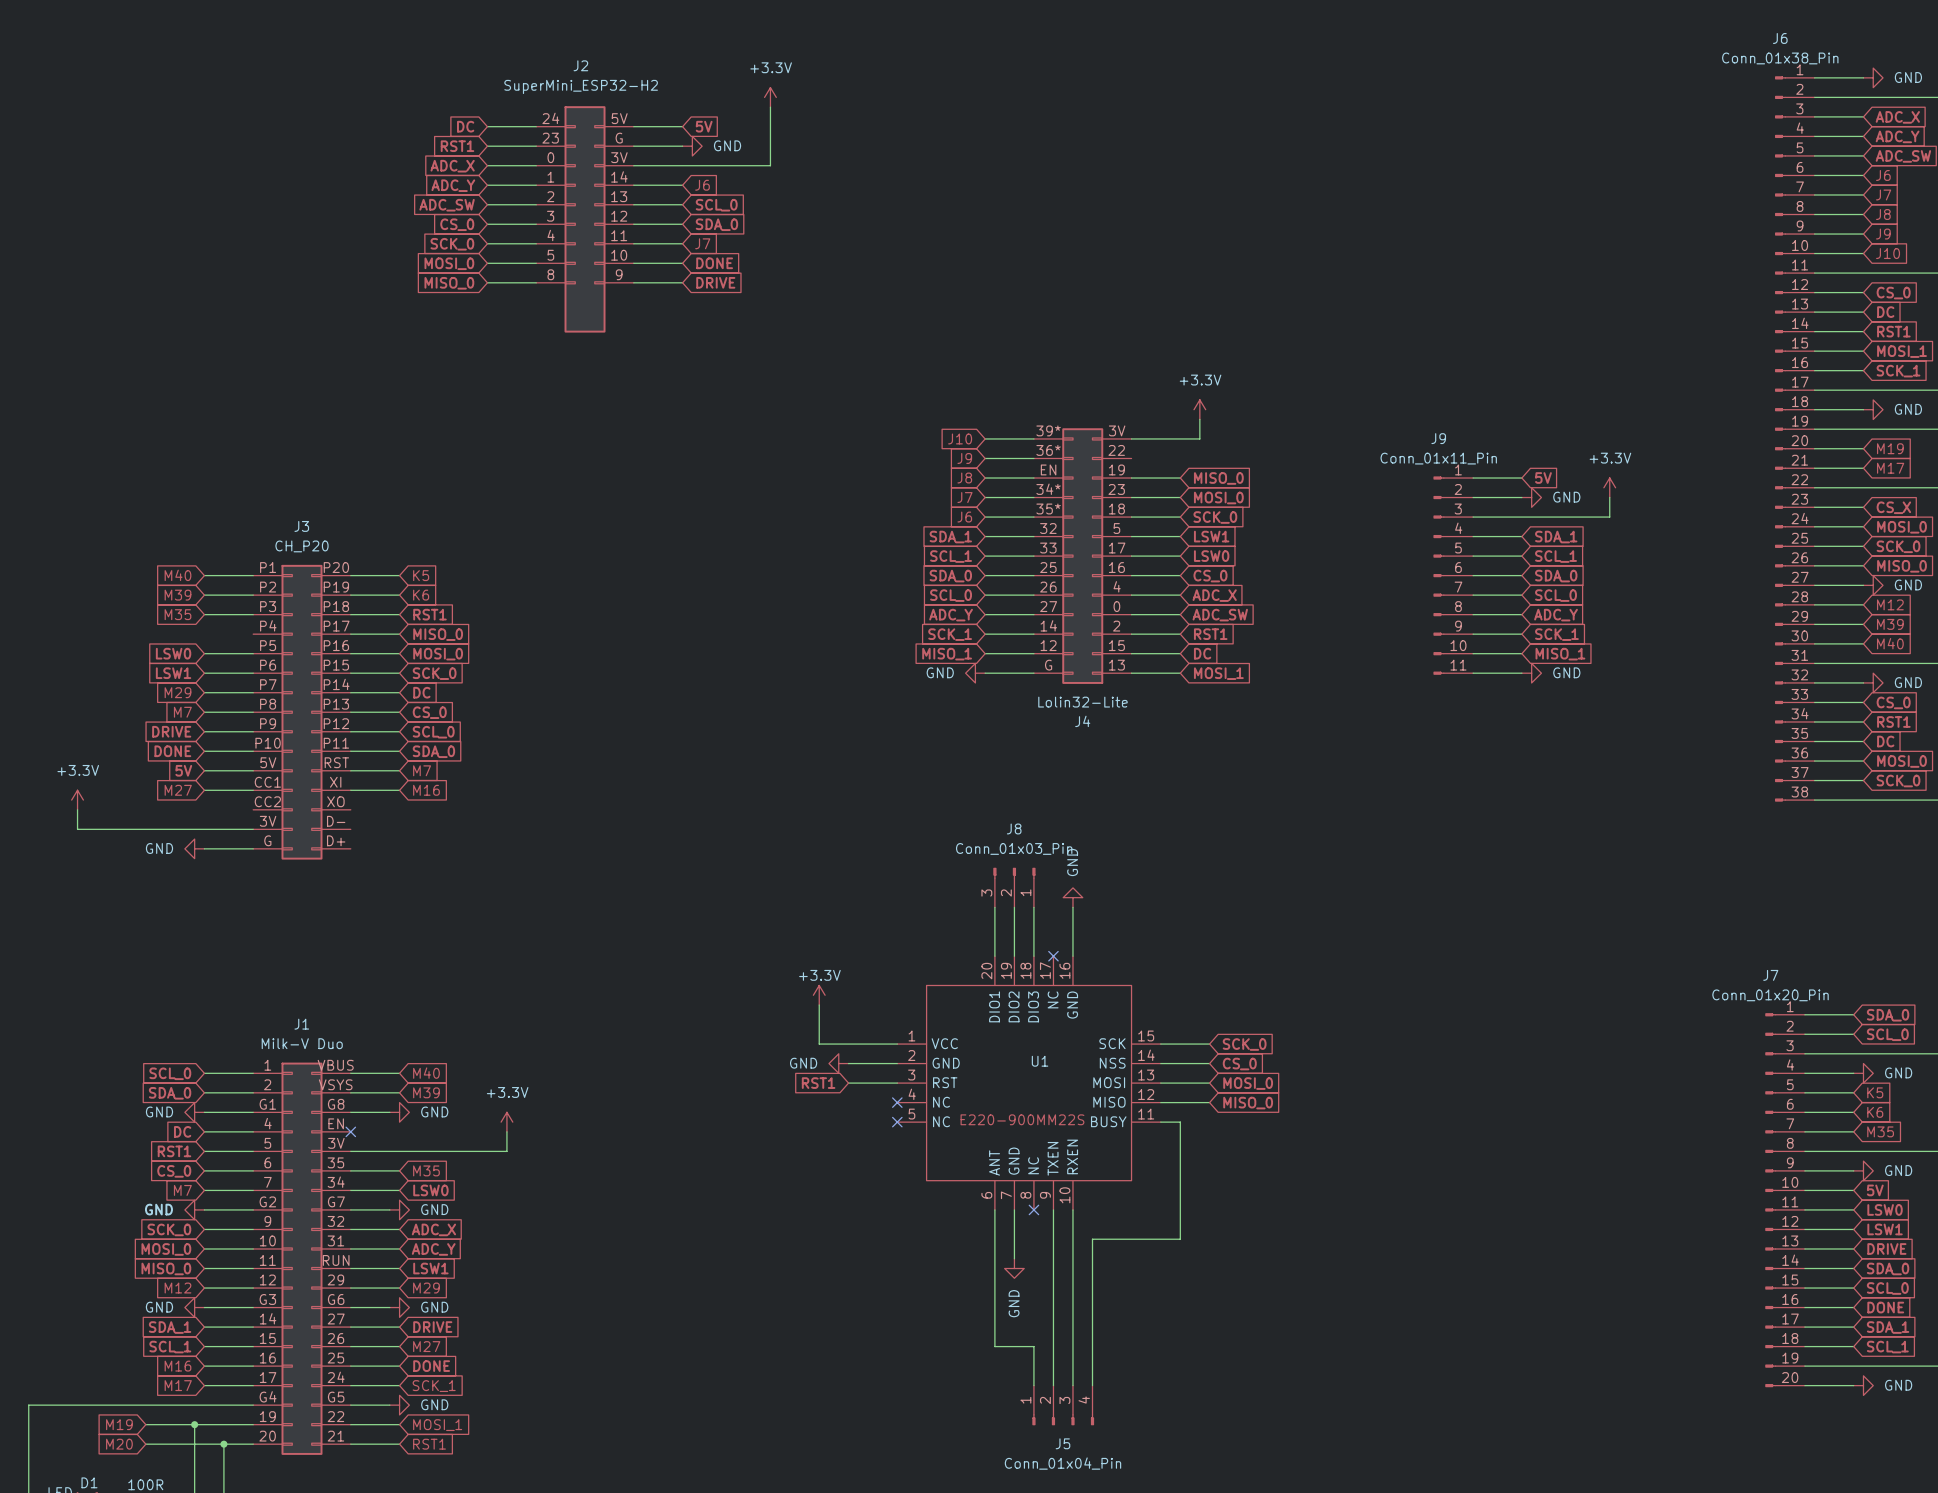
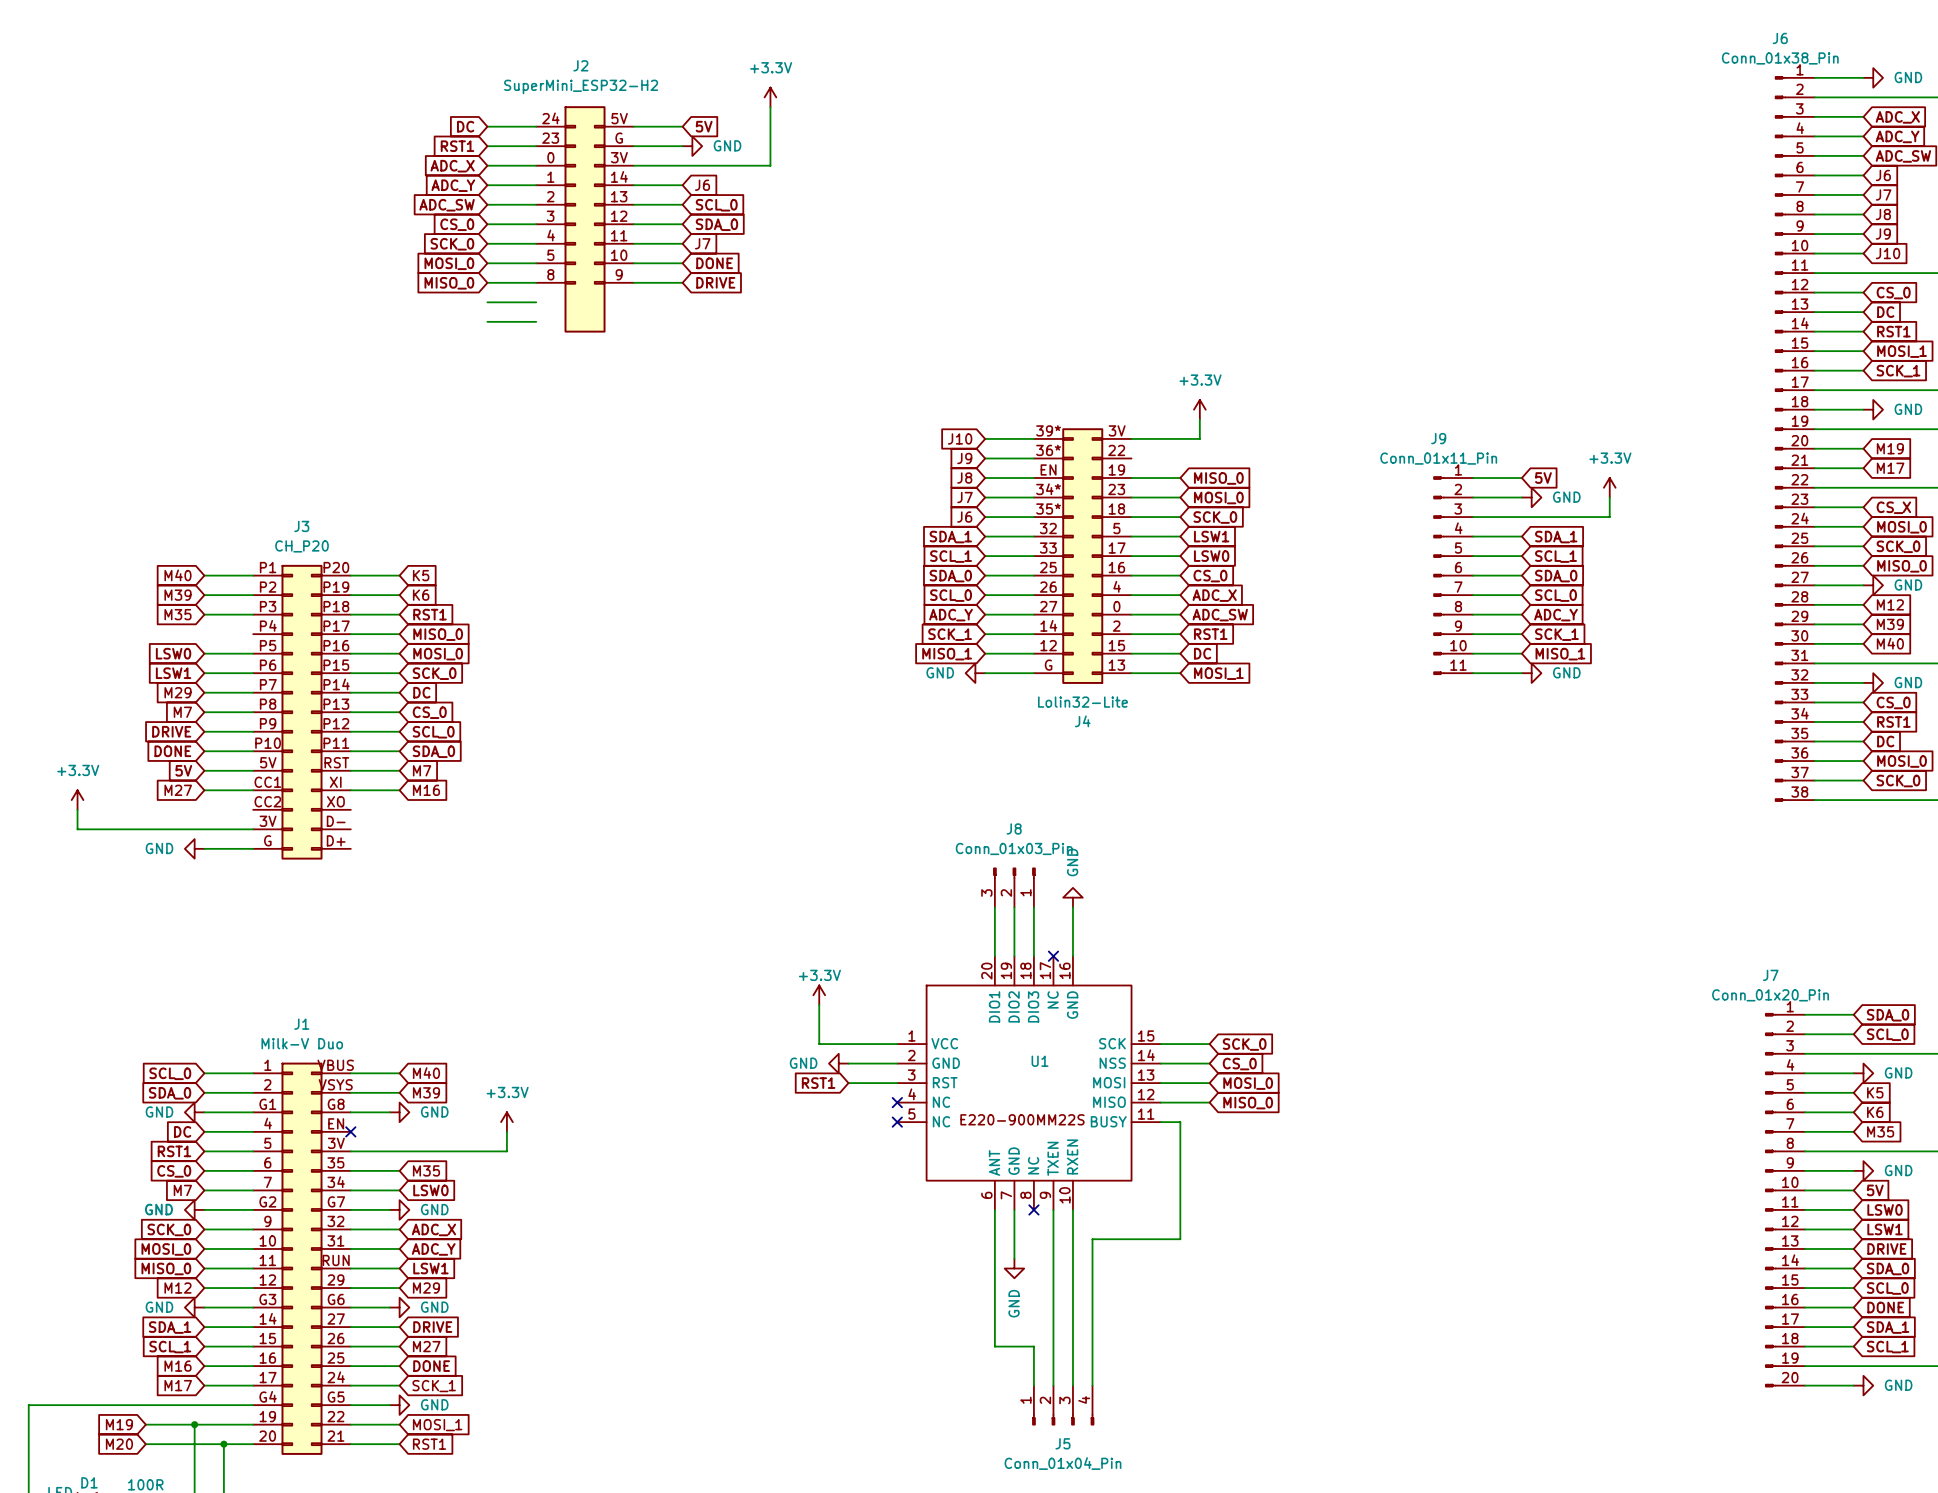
wire: none -> (487, 302) (536, 302)
wire: none -> (487, 321) (536, 321)

